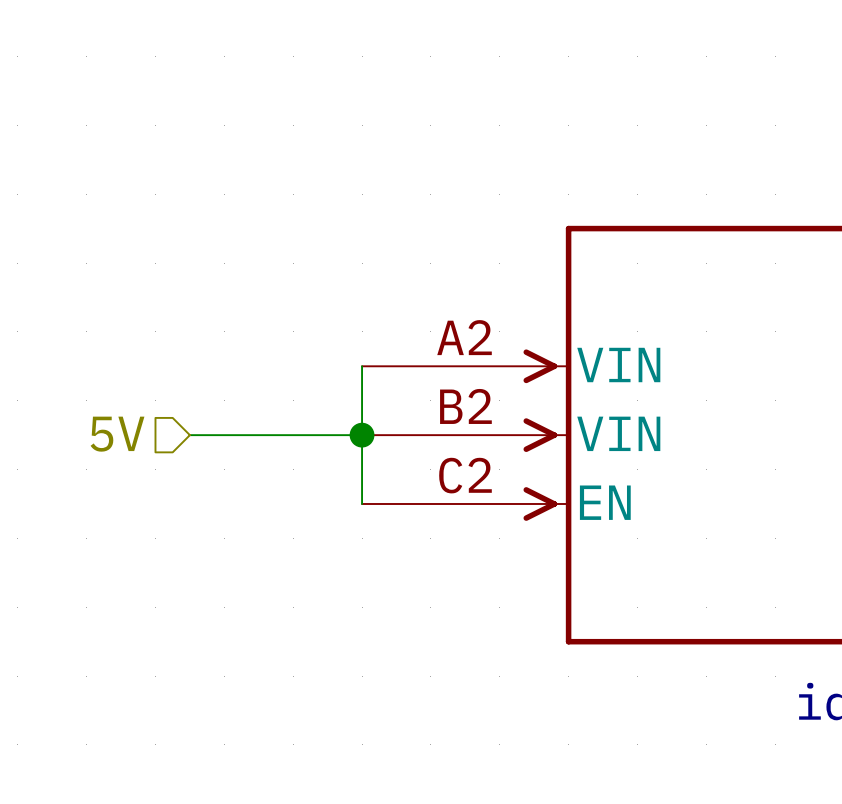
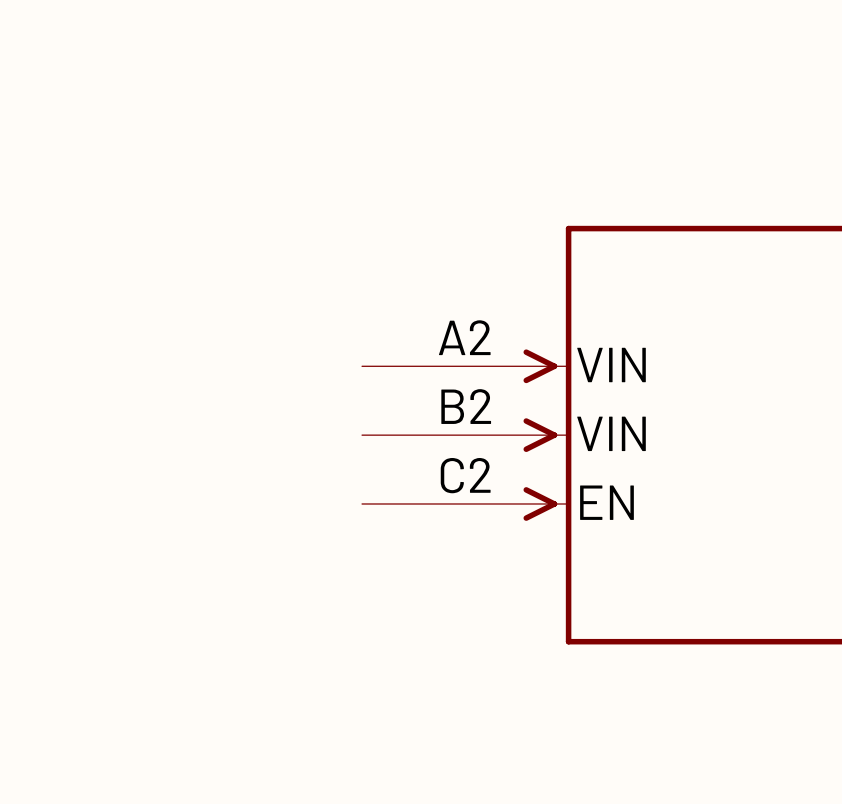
wire: (362, 366) (362, 503) -> none
hierarchical label: 5V (117, 434) -> none
wire: (189, 435) (362, 435) -> none
junction: (362, 435) -> none

